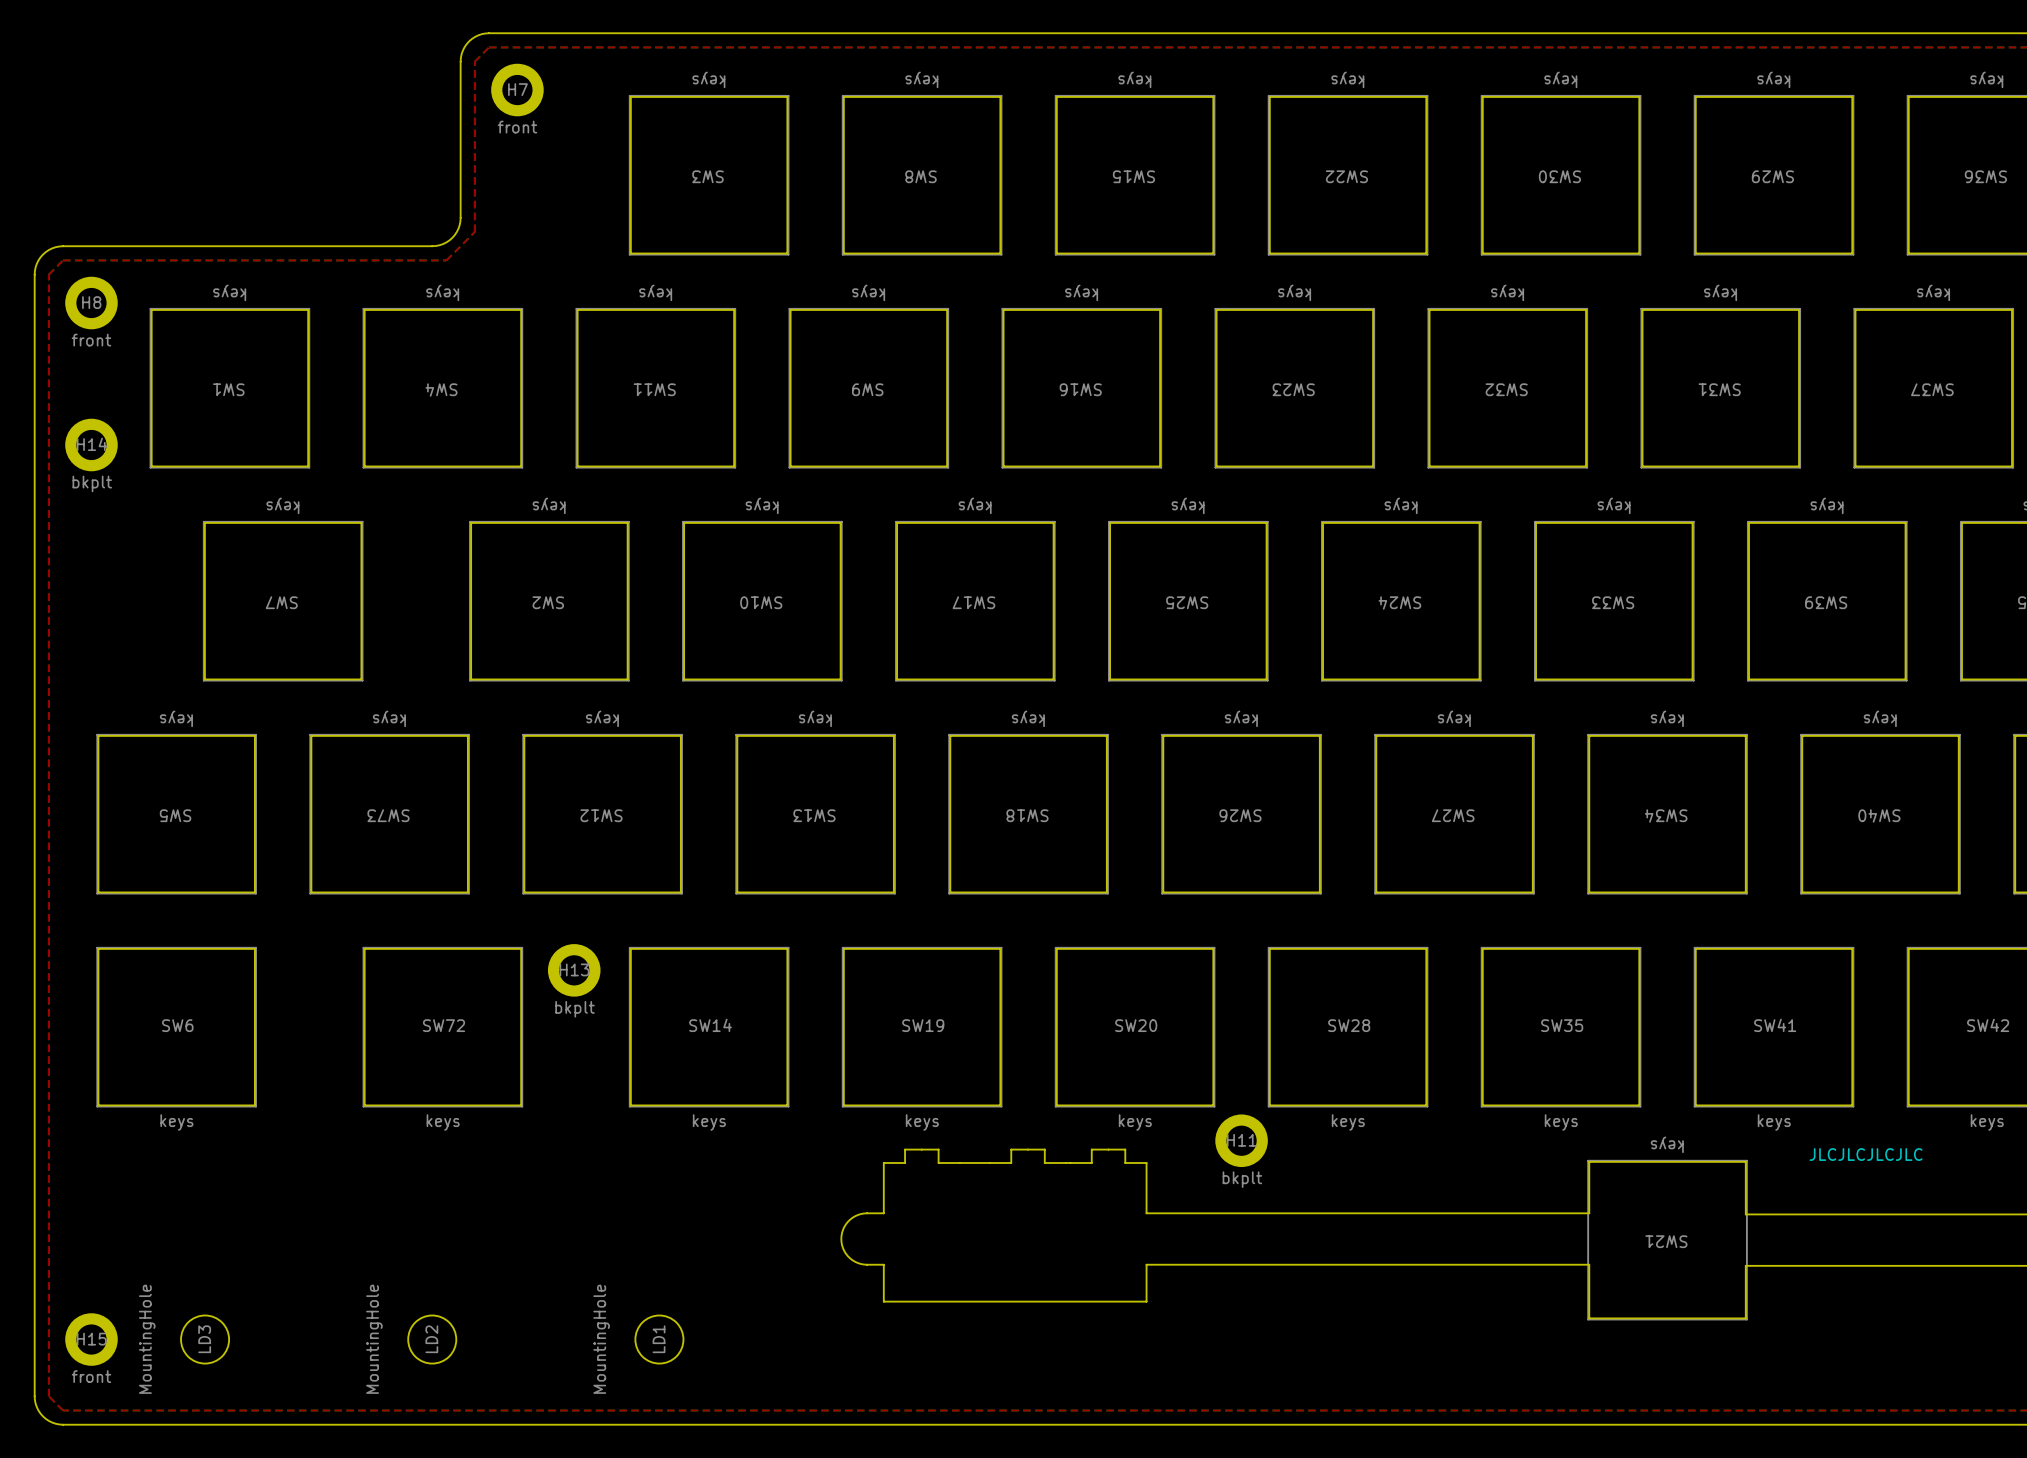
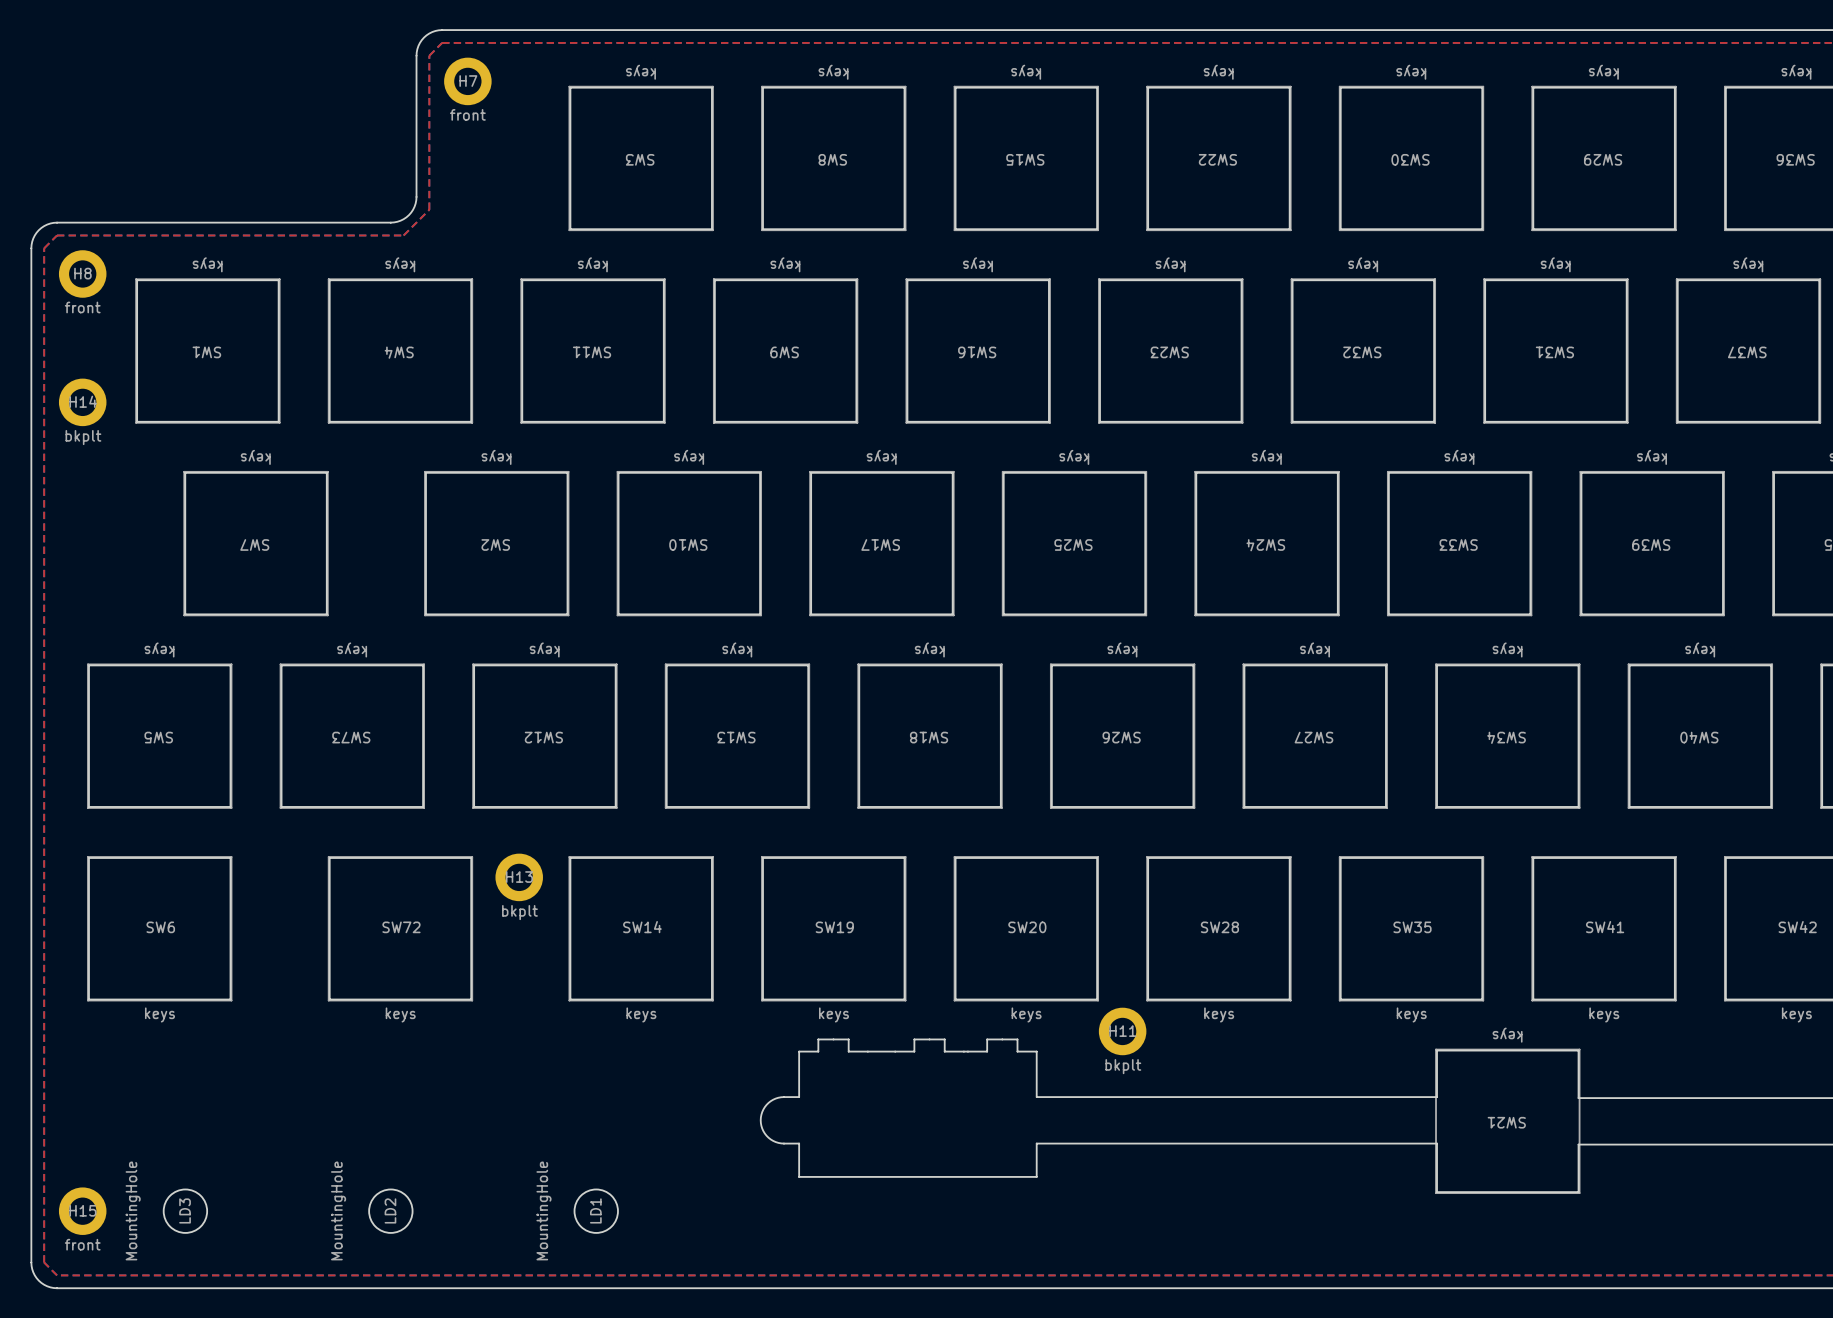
text: JLCJLCJLCJLC (1866, 1154) -> none

